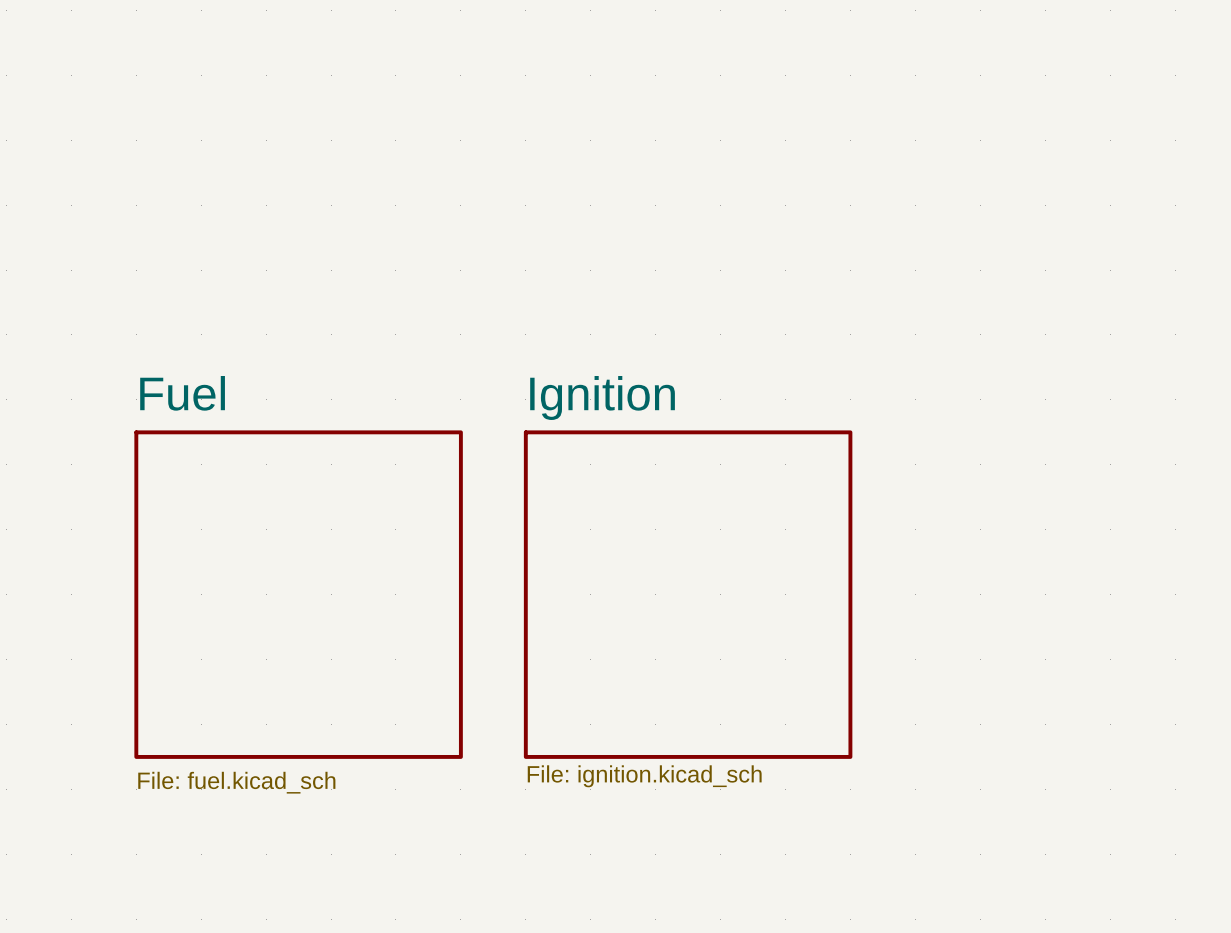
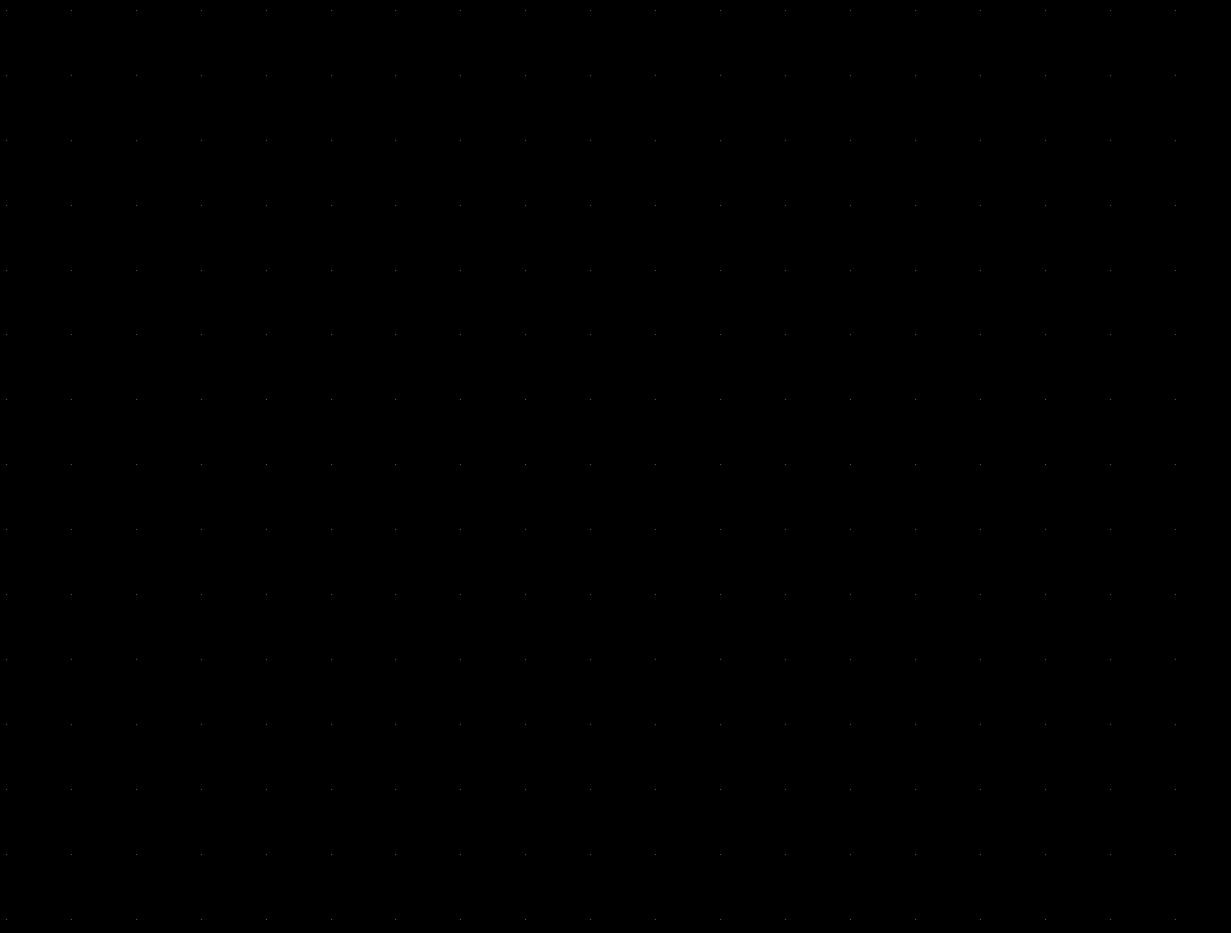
sheet Fuel: File: fuel.kicad_sch (298, 594) -> none
sheet Ignition: File: ignition.kicad_sch (688, 594) -> none

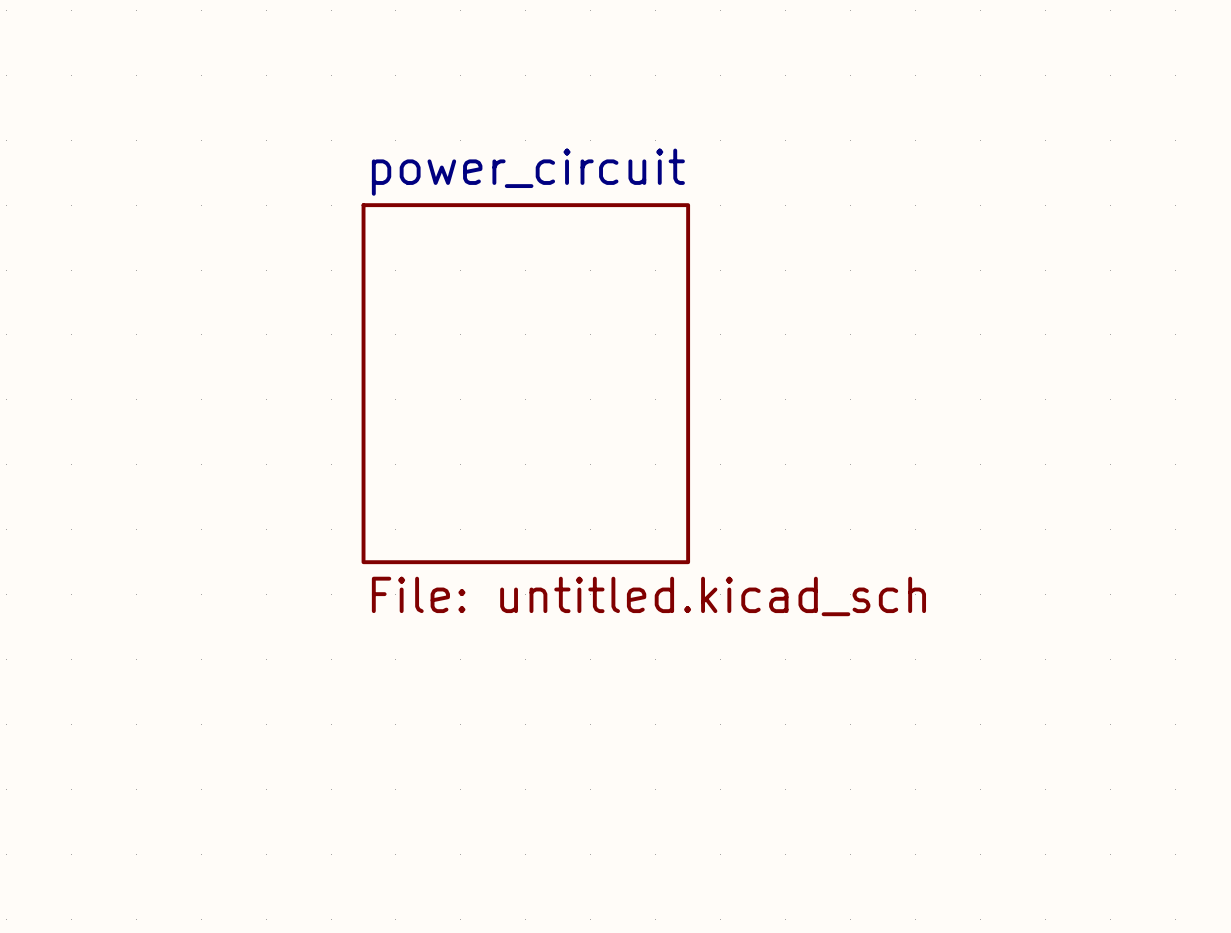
sheet power_circuit: none -> File: untitled.kicad_sch (525, 383)

